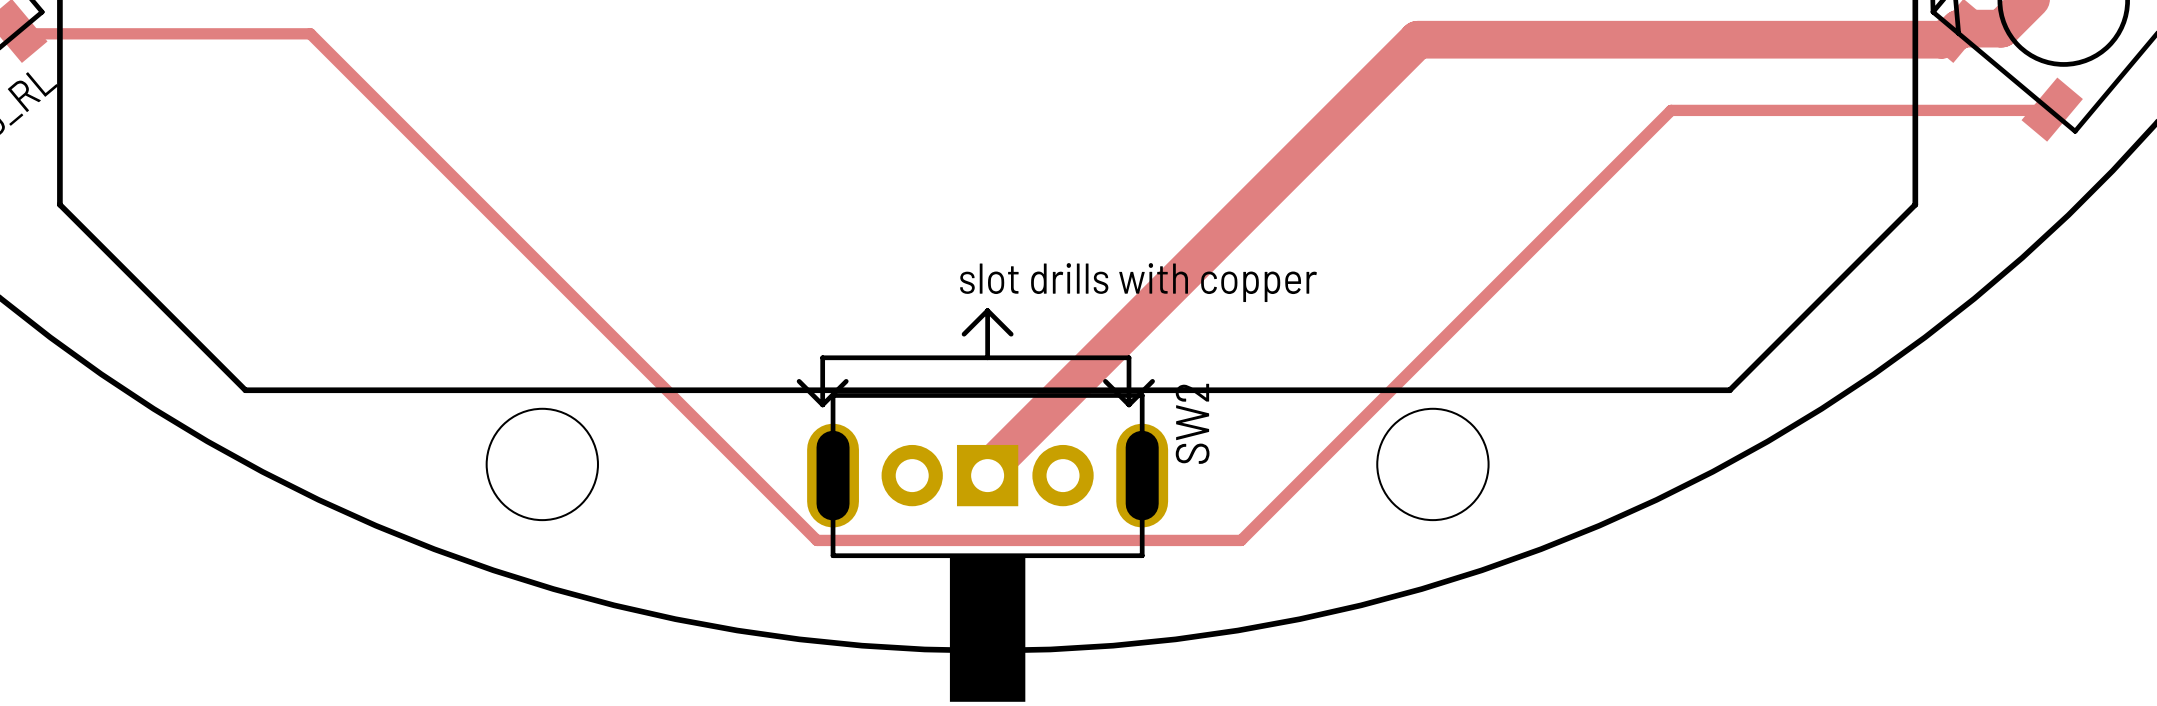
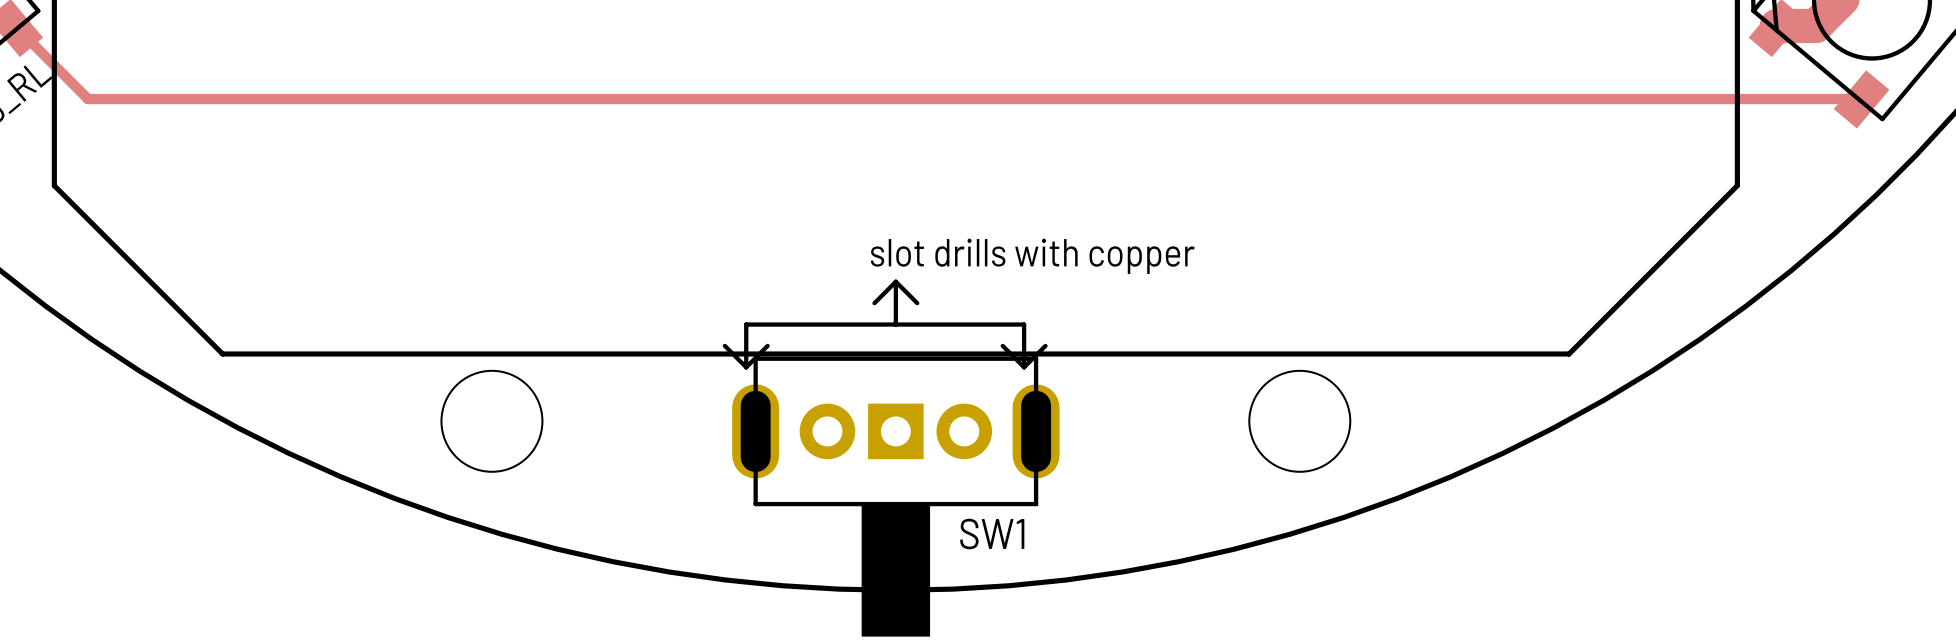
track: (16, 30) (21, 33) (310, 33) (816, 540) (1241, 540) (1671, 110) (2052, 109) -> none
track: (1958, 30) (1942, 39) (1417, 39) (987, 469) (987, 475) -> none
track: none -> (18, 29) (88, 99) (1857, 99)
SW2 name: SW2 (1192, 423) -> SW1 (992, 534)

